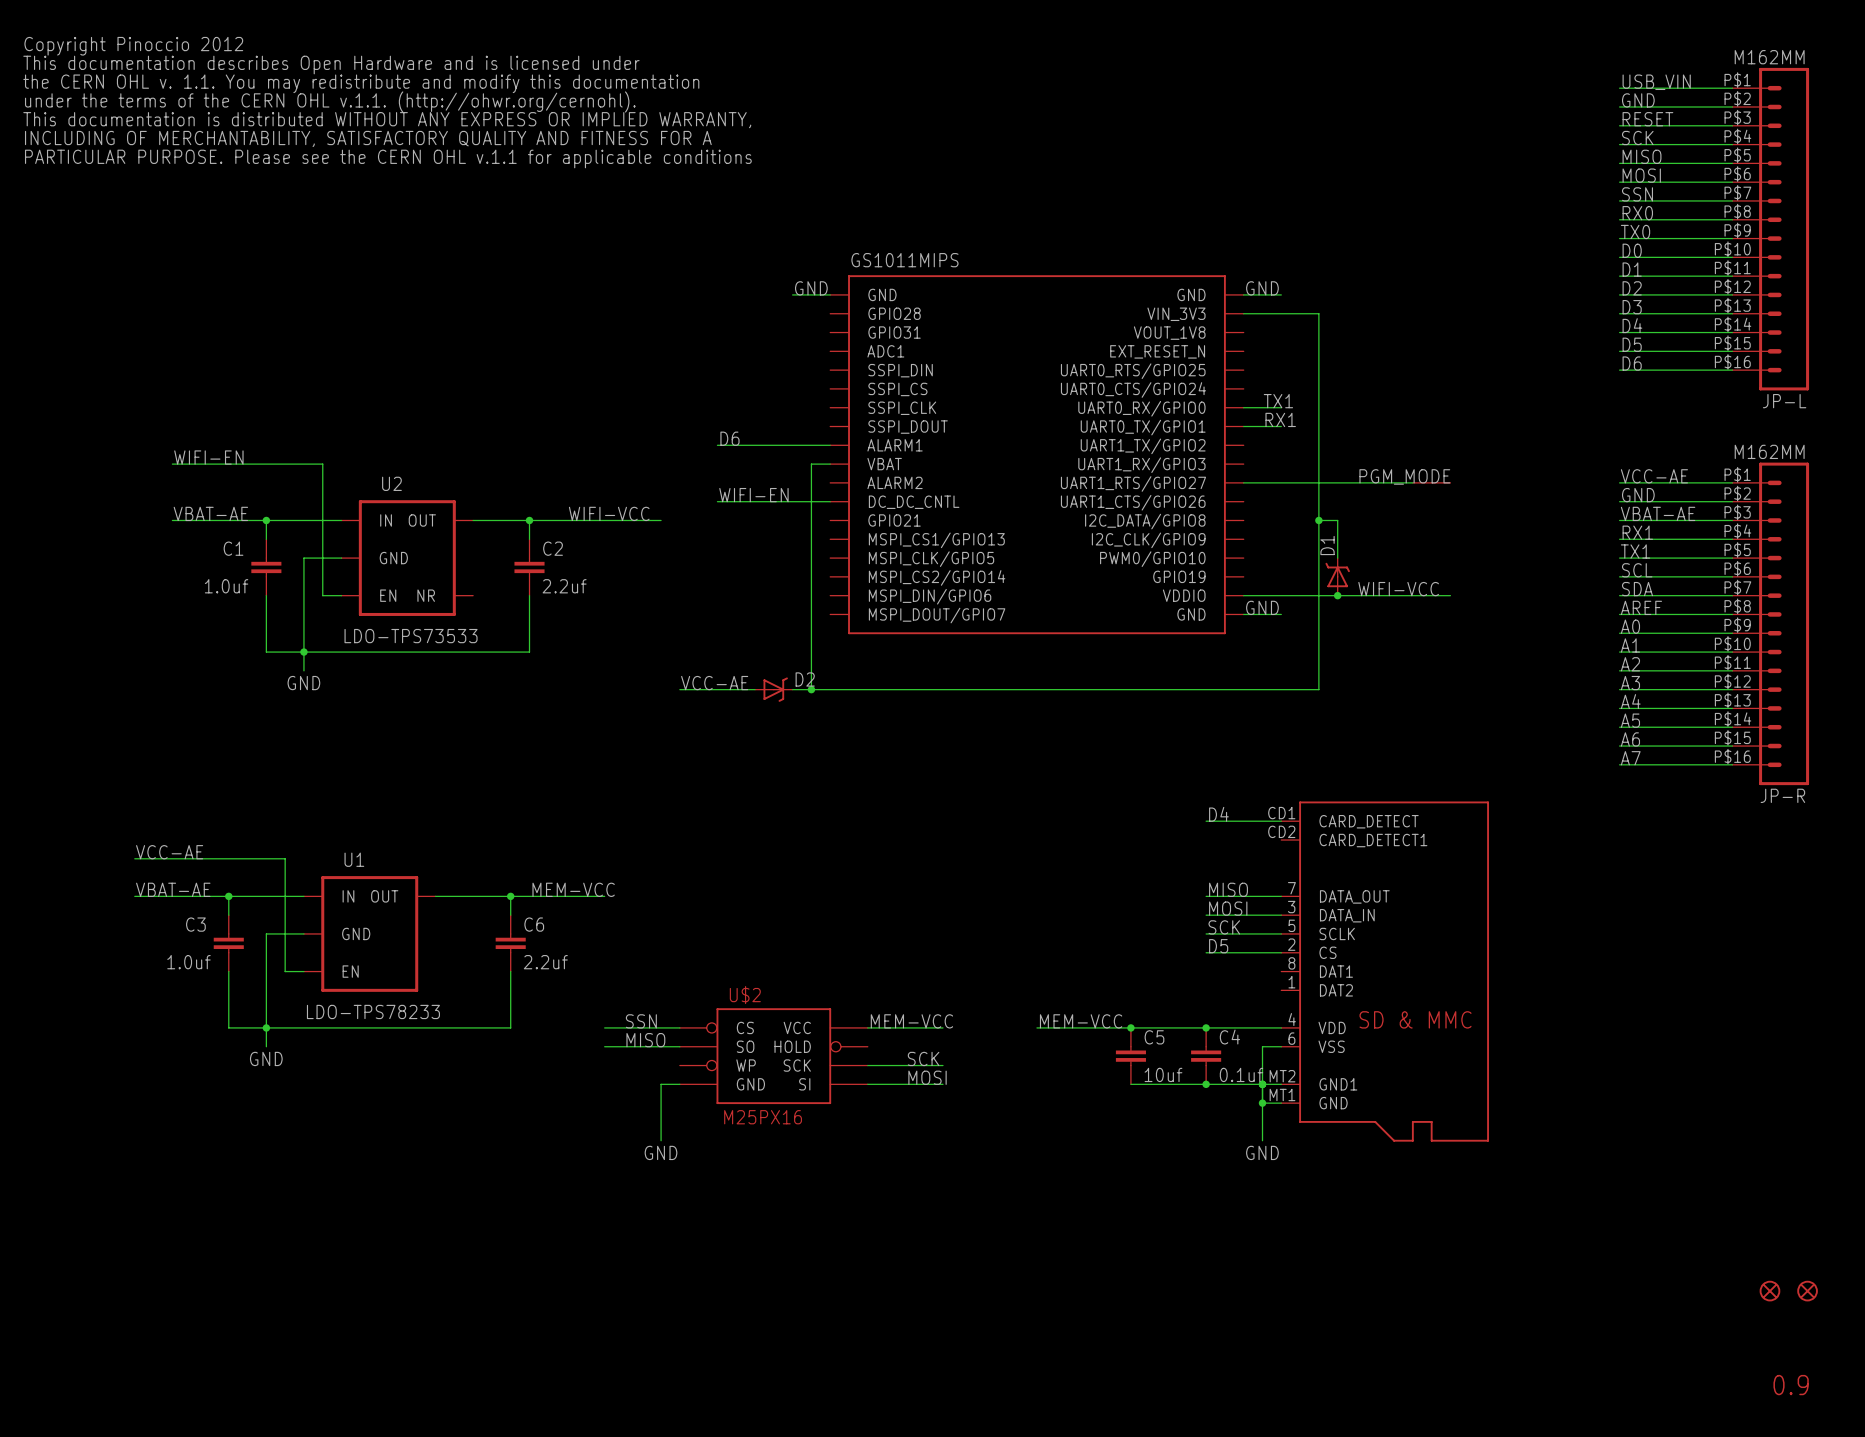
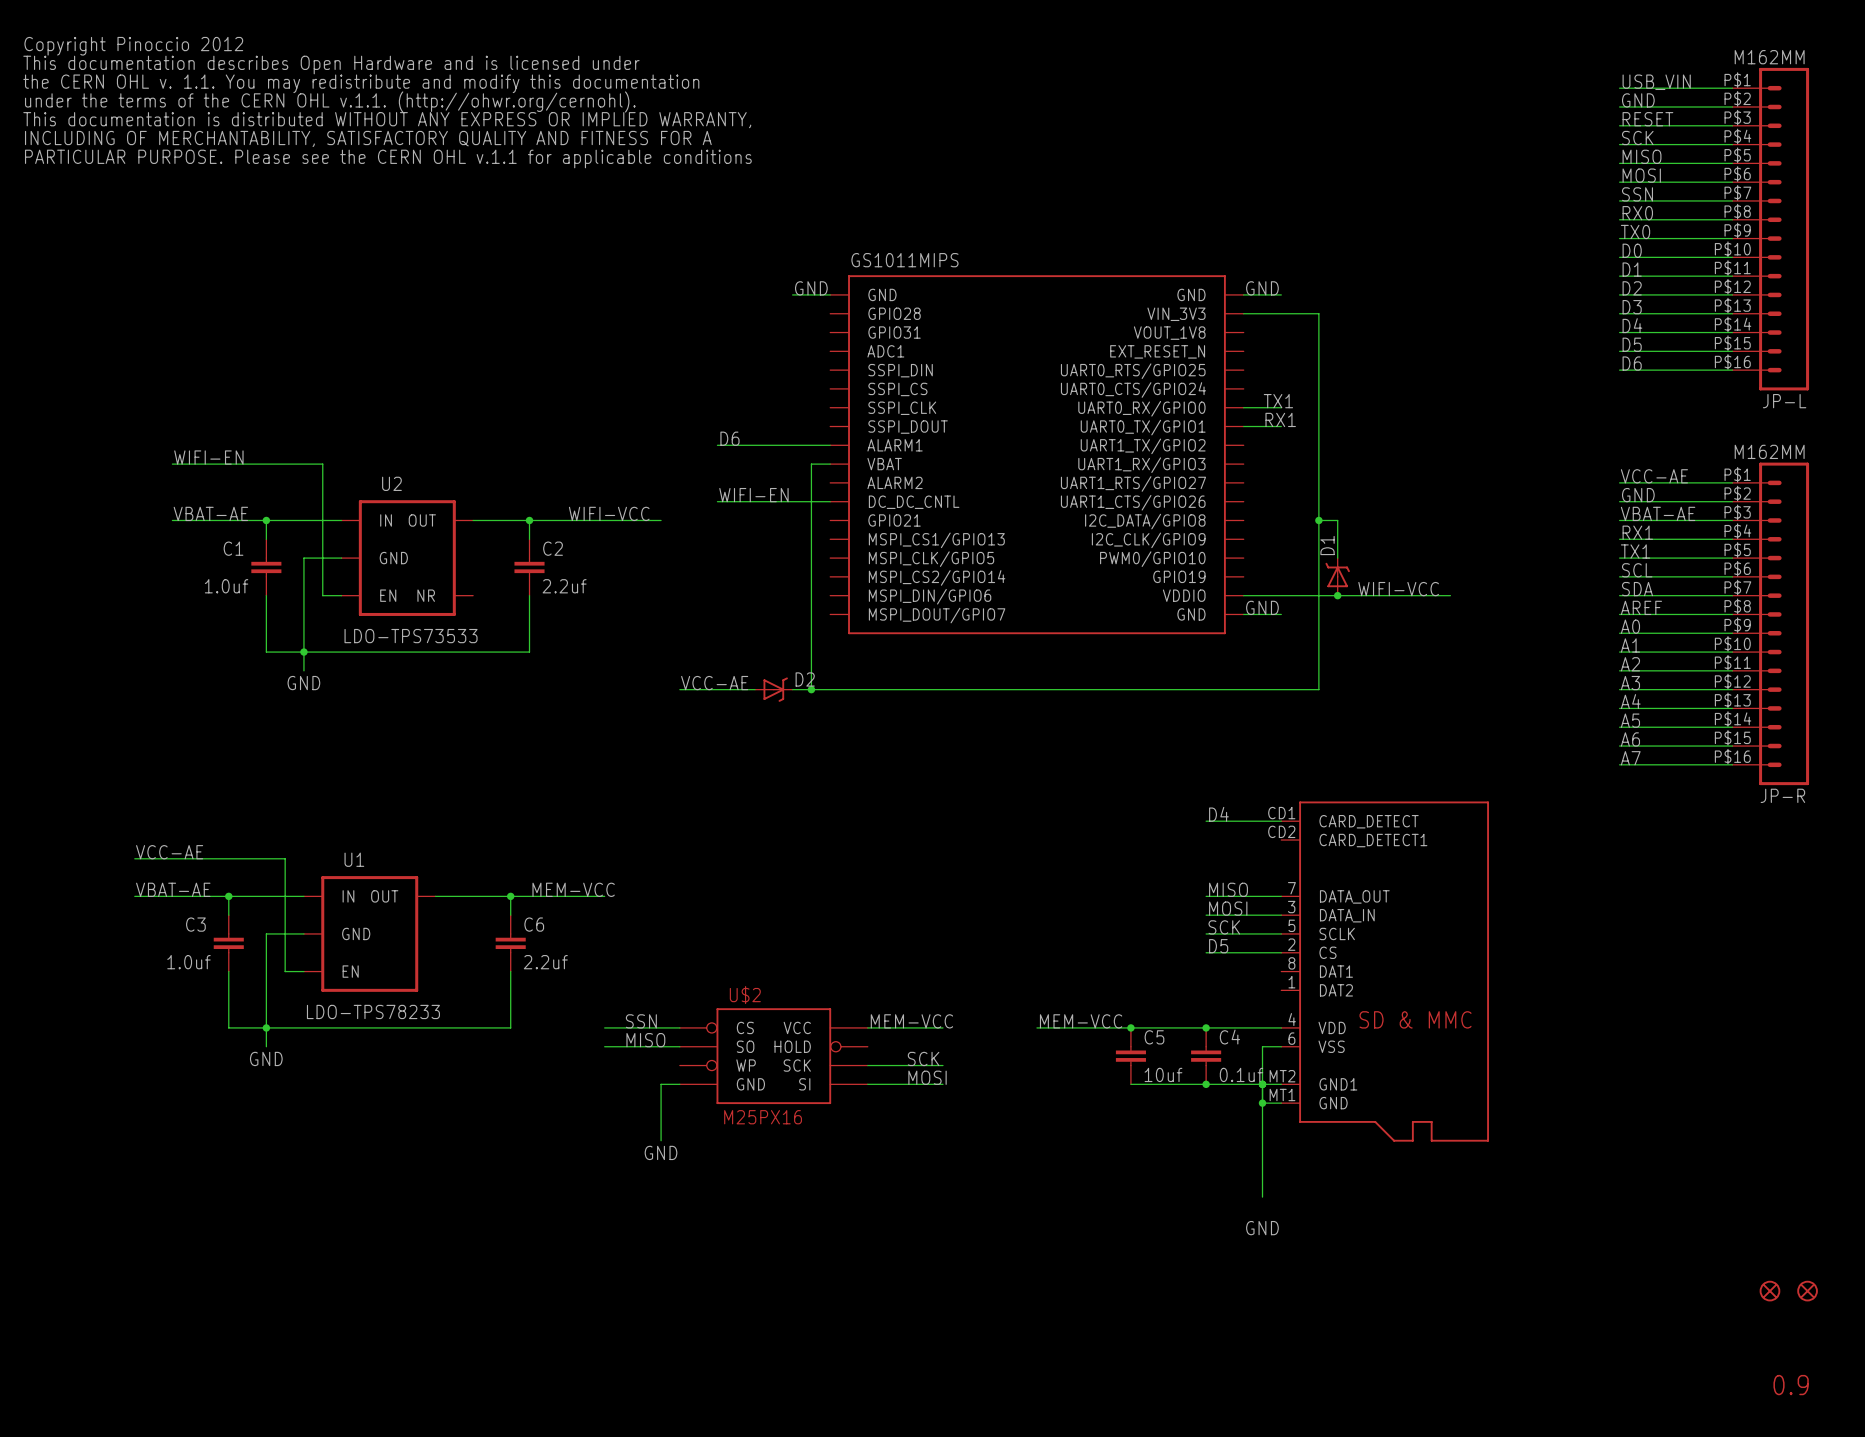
label: PGM_MODE (1404, 476) -> none
wire: (1243, 482) (1412, 482) -> none
part: (1431, 482) -> none
wire: none -> (1262, 1140) (1262, 1197)
label position: GND (1262, 1152) -> GND (1262, 1228)

